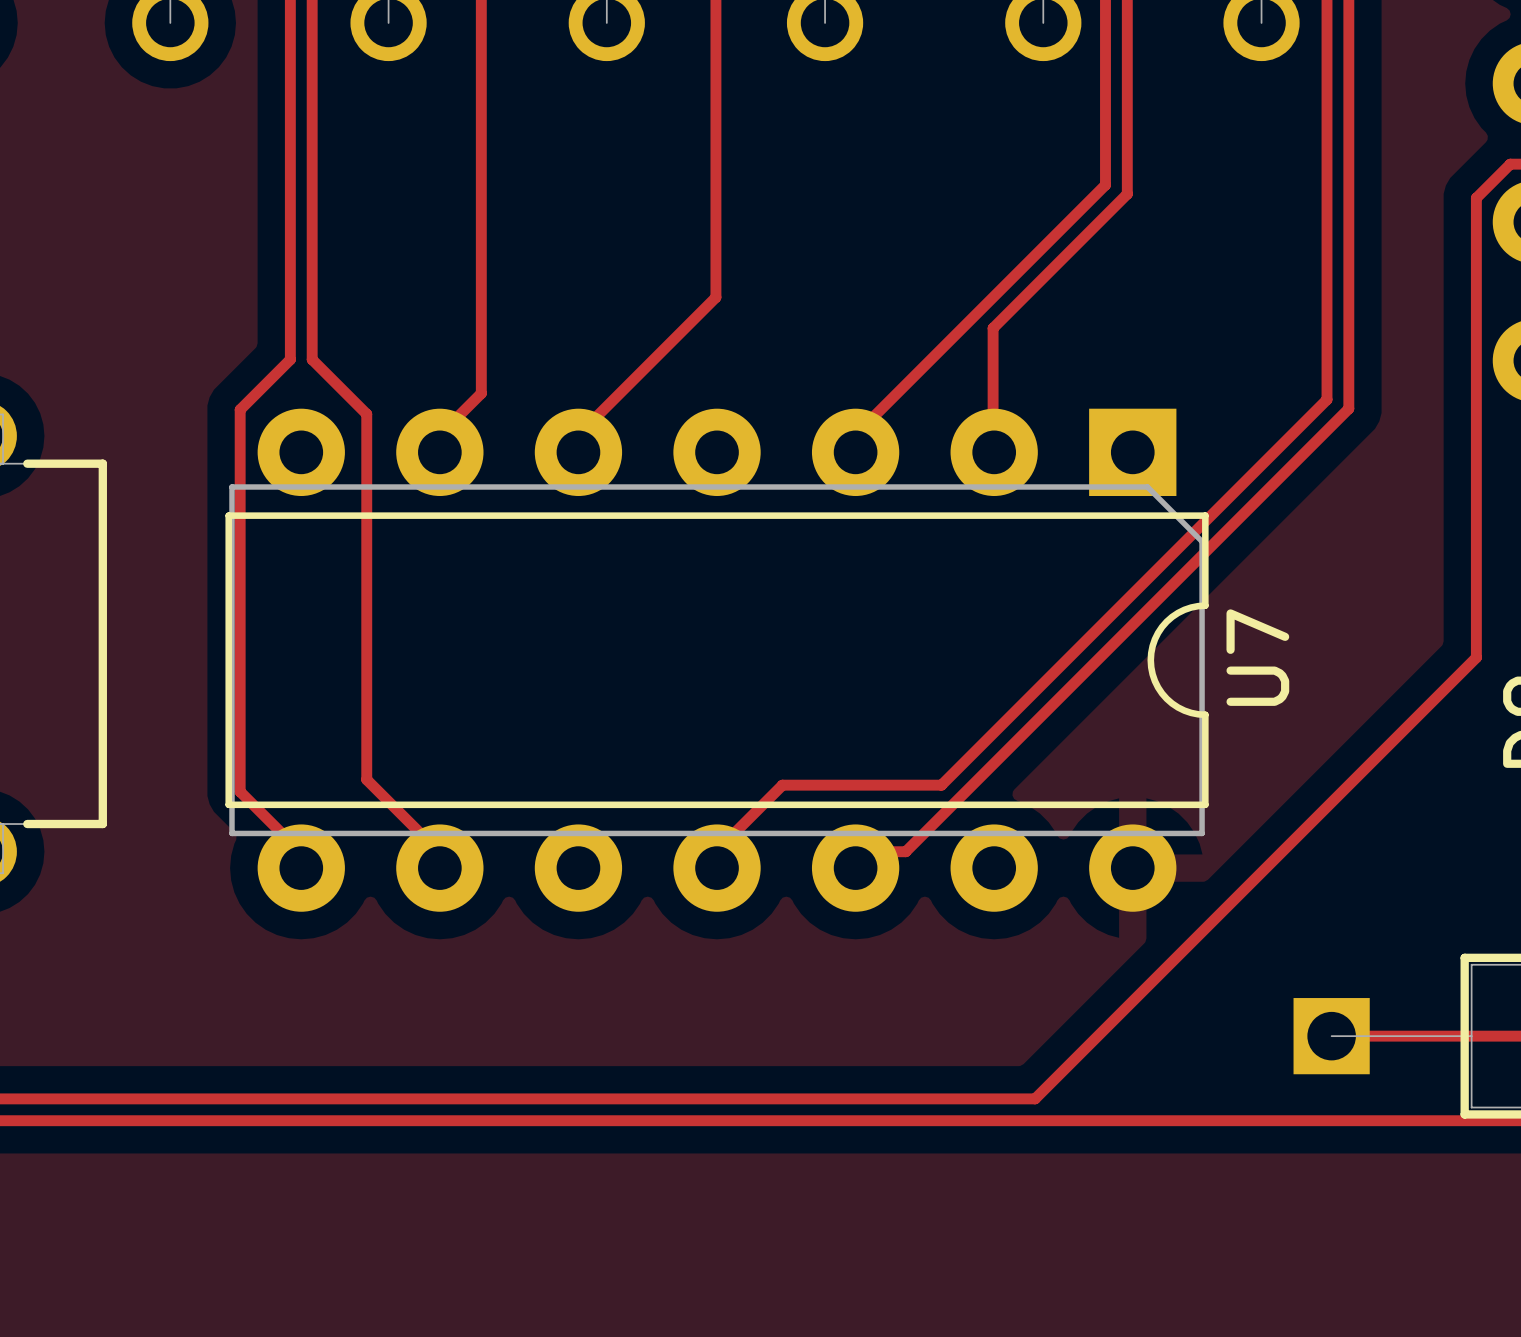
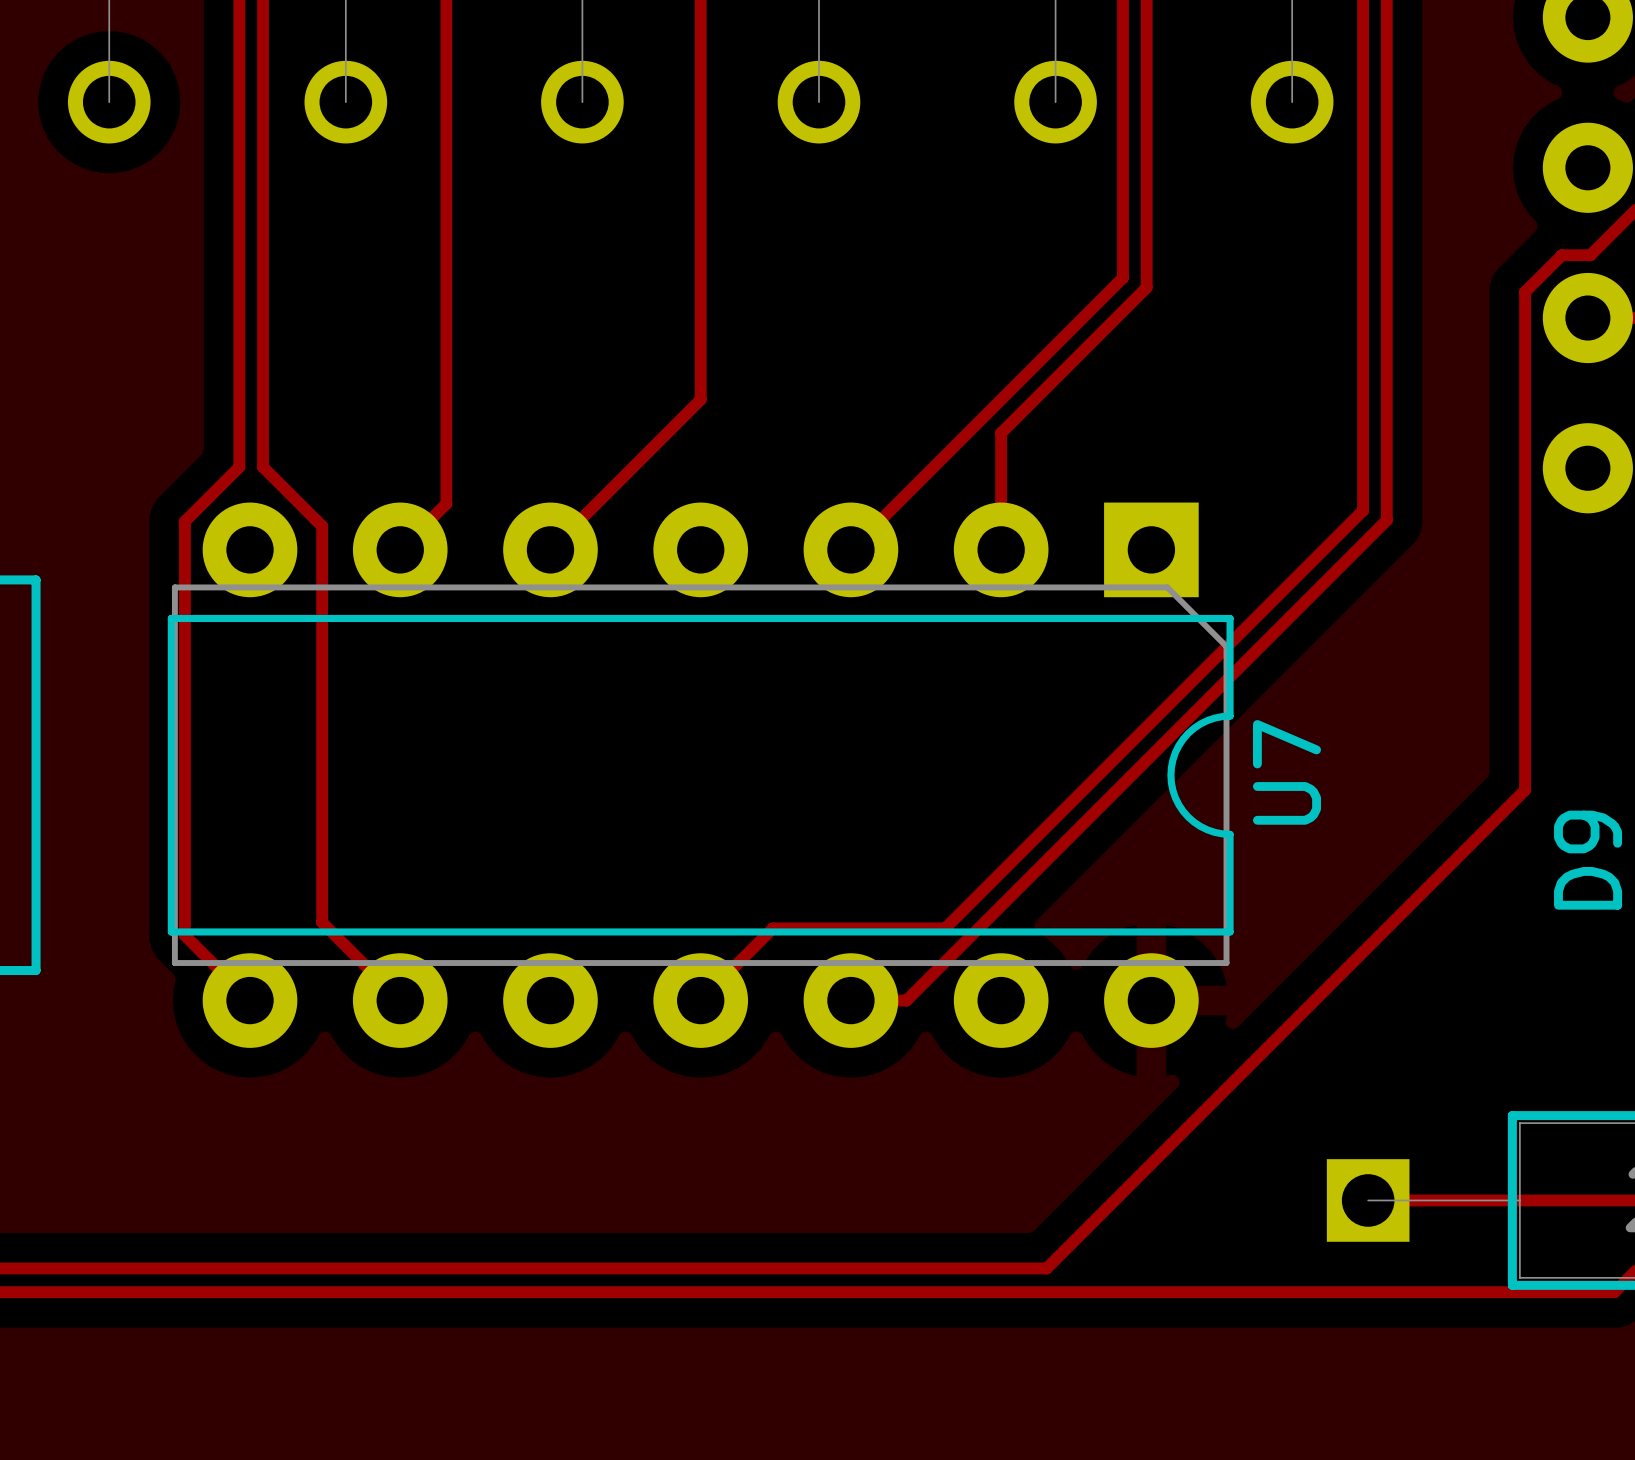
U7 position: (717, 660) -> (700, 775)

